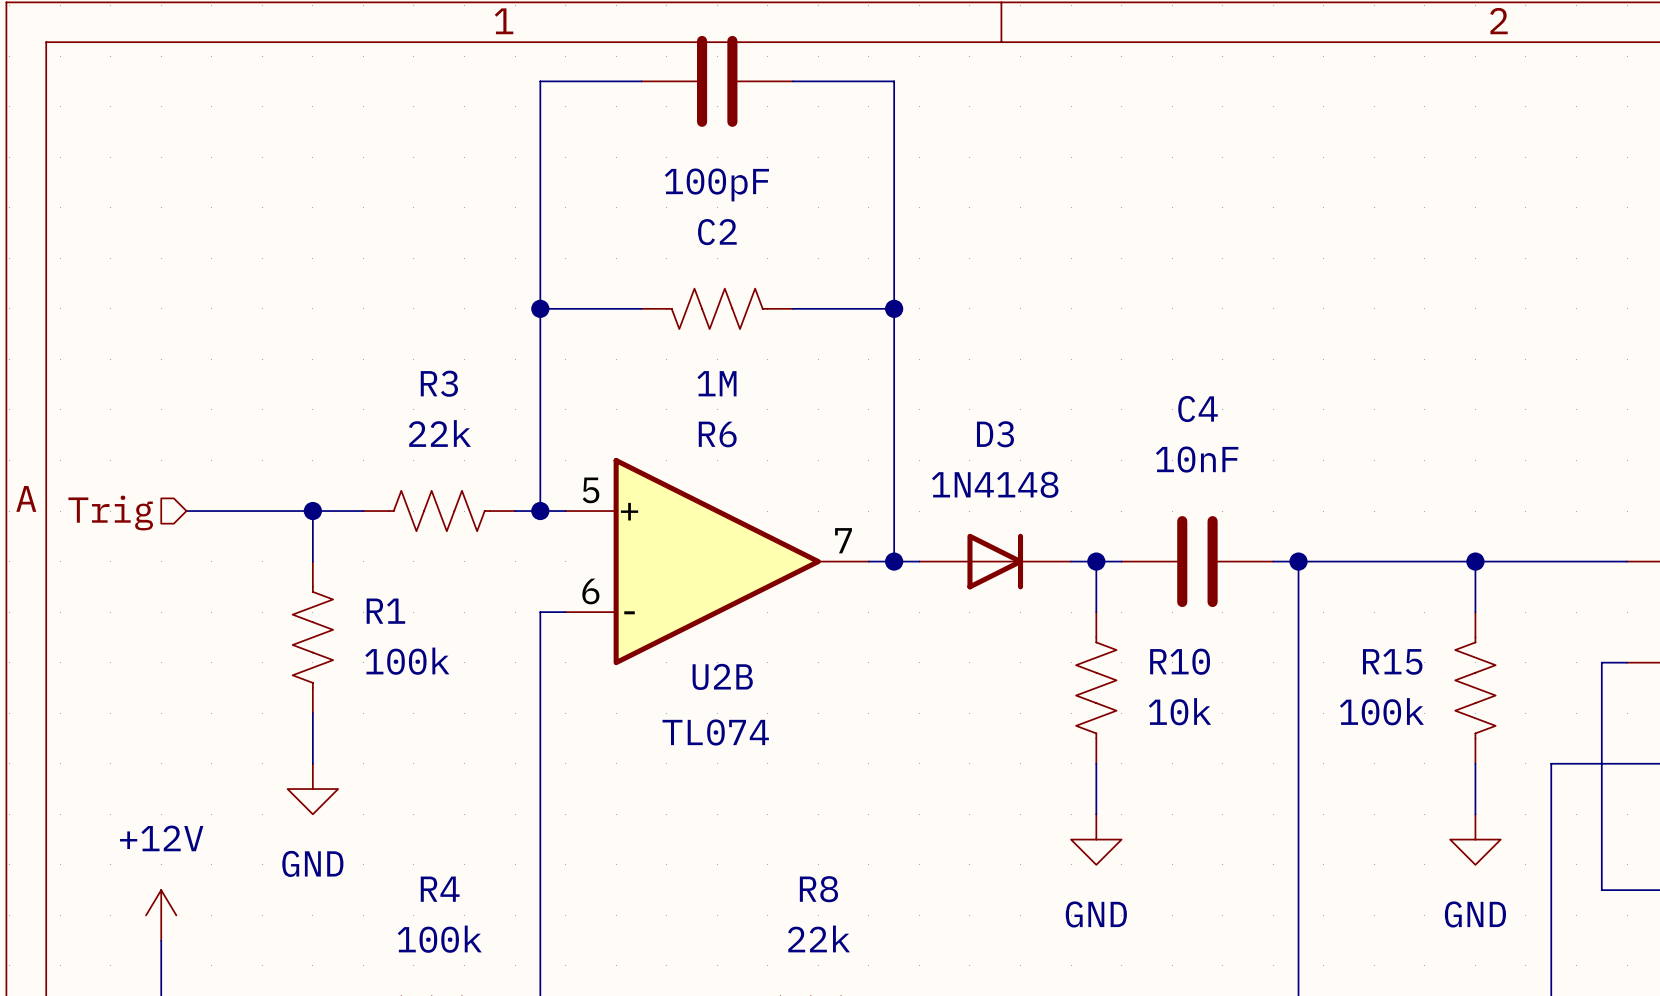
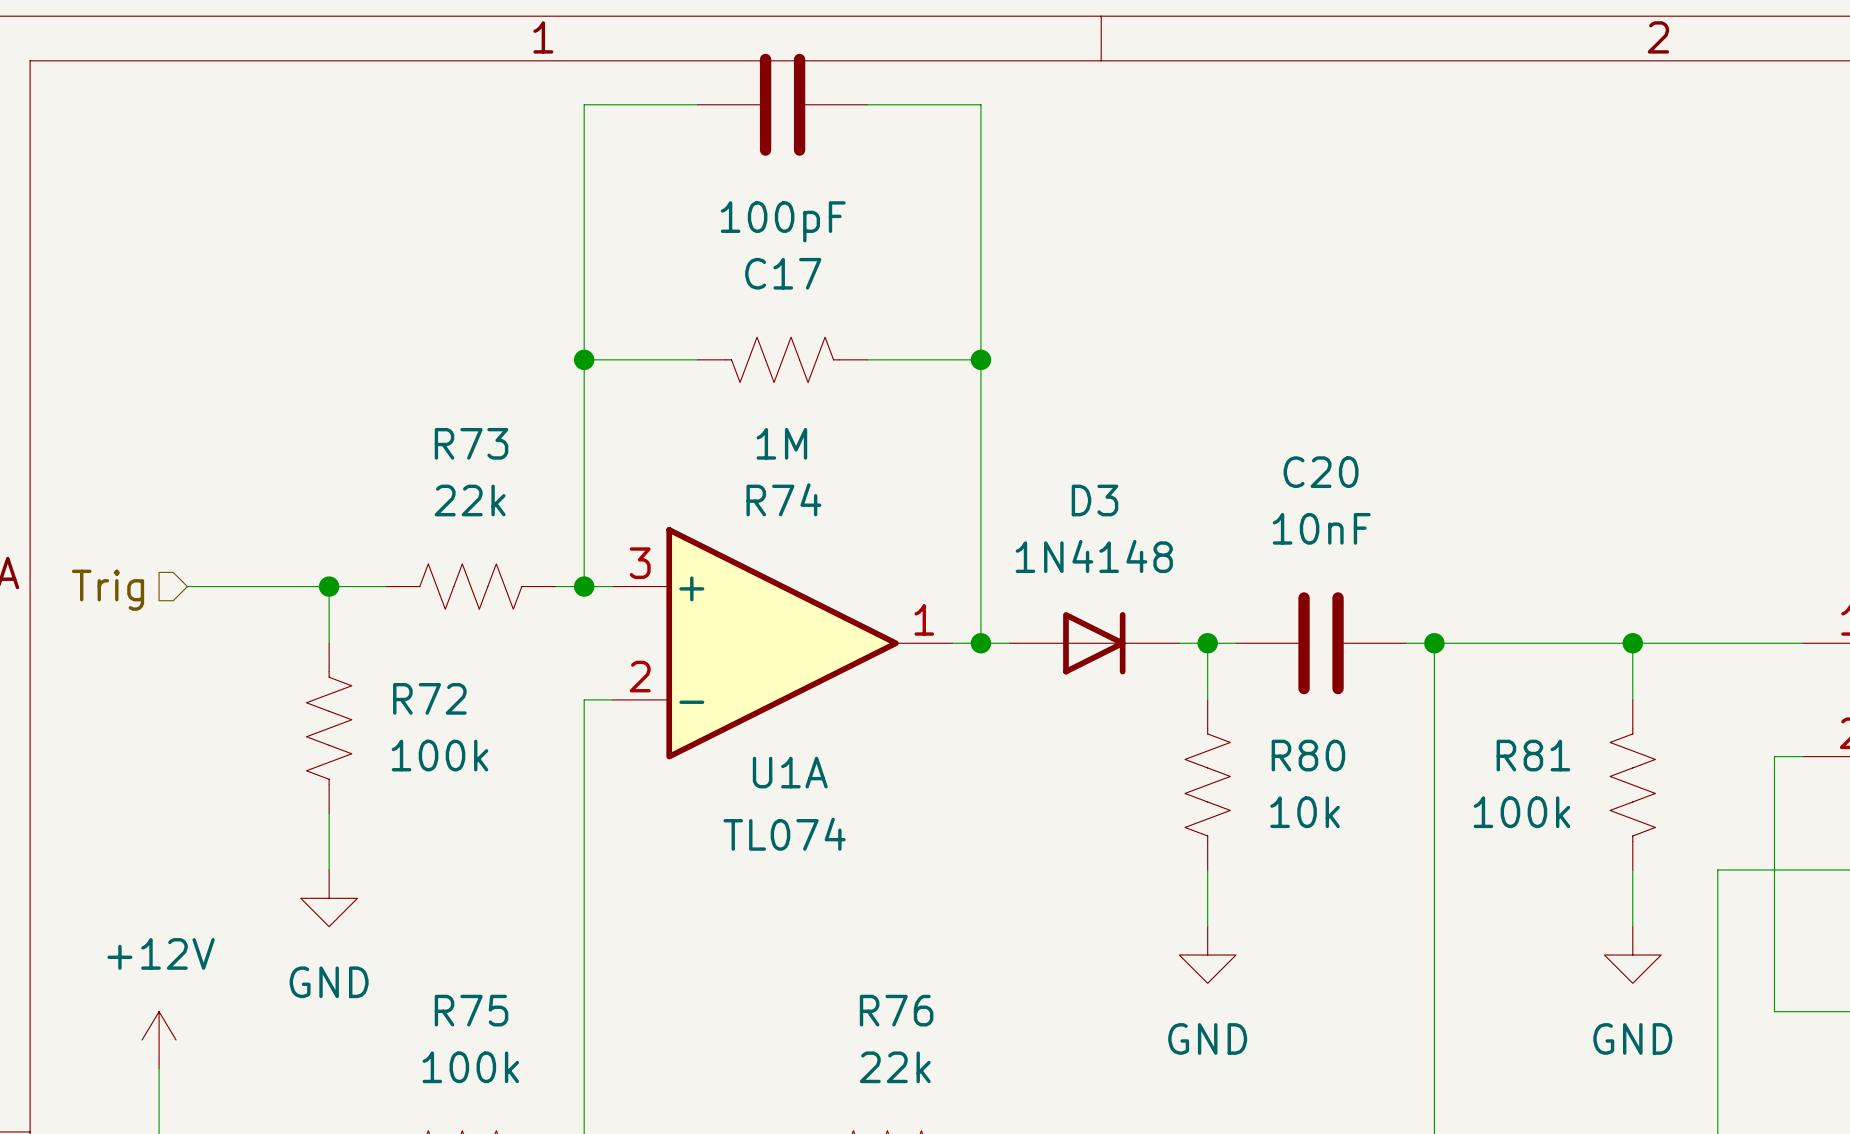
C2 name: C2 (717, 232) -> C17 (783, 273)
R3 name: R3 (439, 383) -> R73 (471, 443)
C4 name: C4 (1198, 408) -> C20 (1321, 472)
R6 name: R6 (717, 434) -> R74 (783, 499)
U2B pin number: 5 (590, 490) -> 3 (640, 563)
U2B pin number: 7 (843, 540) -> 1 (924, 619)
U2B pin number: 6 (590, 591) -> 2 (640, 676)
R1 name: R1 (385, 611) -> R72 (429, 698)
R10 name: R10 (1180, 661) -> R80 (1308, 755)
R15 name: R15 (1392, 661) -> R81 (1533, 755)
U2B name: U2B (722, 676) -> U1A (790, 772)
R4 name: R4 (440, 889) -> R75 (471, 1010)
R8 name: R8 (818, 889) -> R76 (896, 1010)

